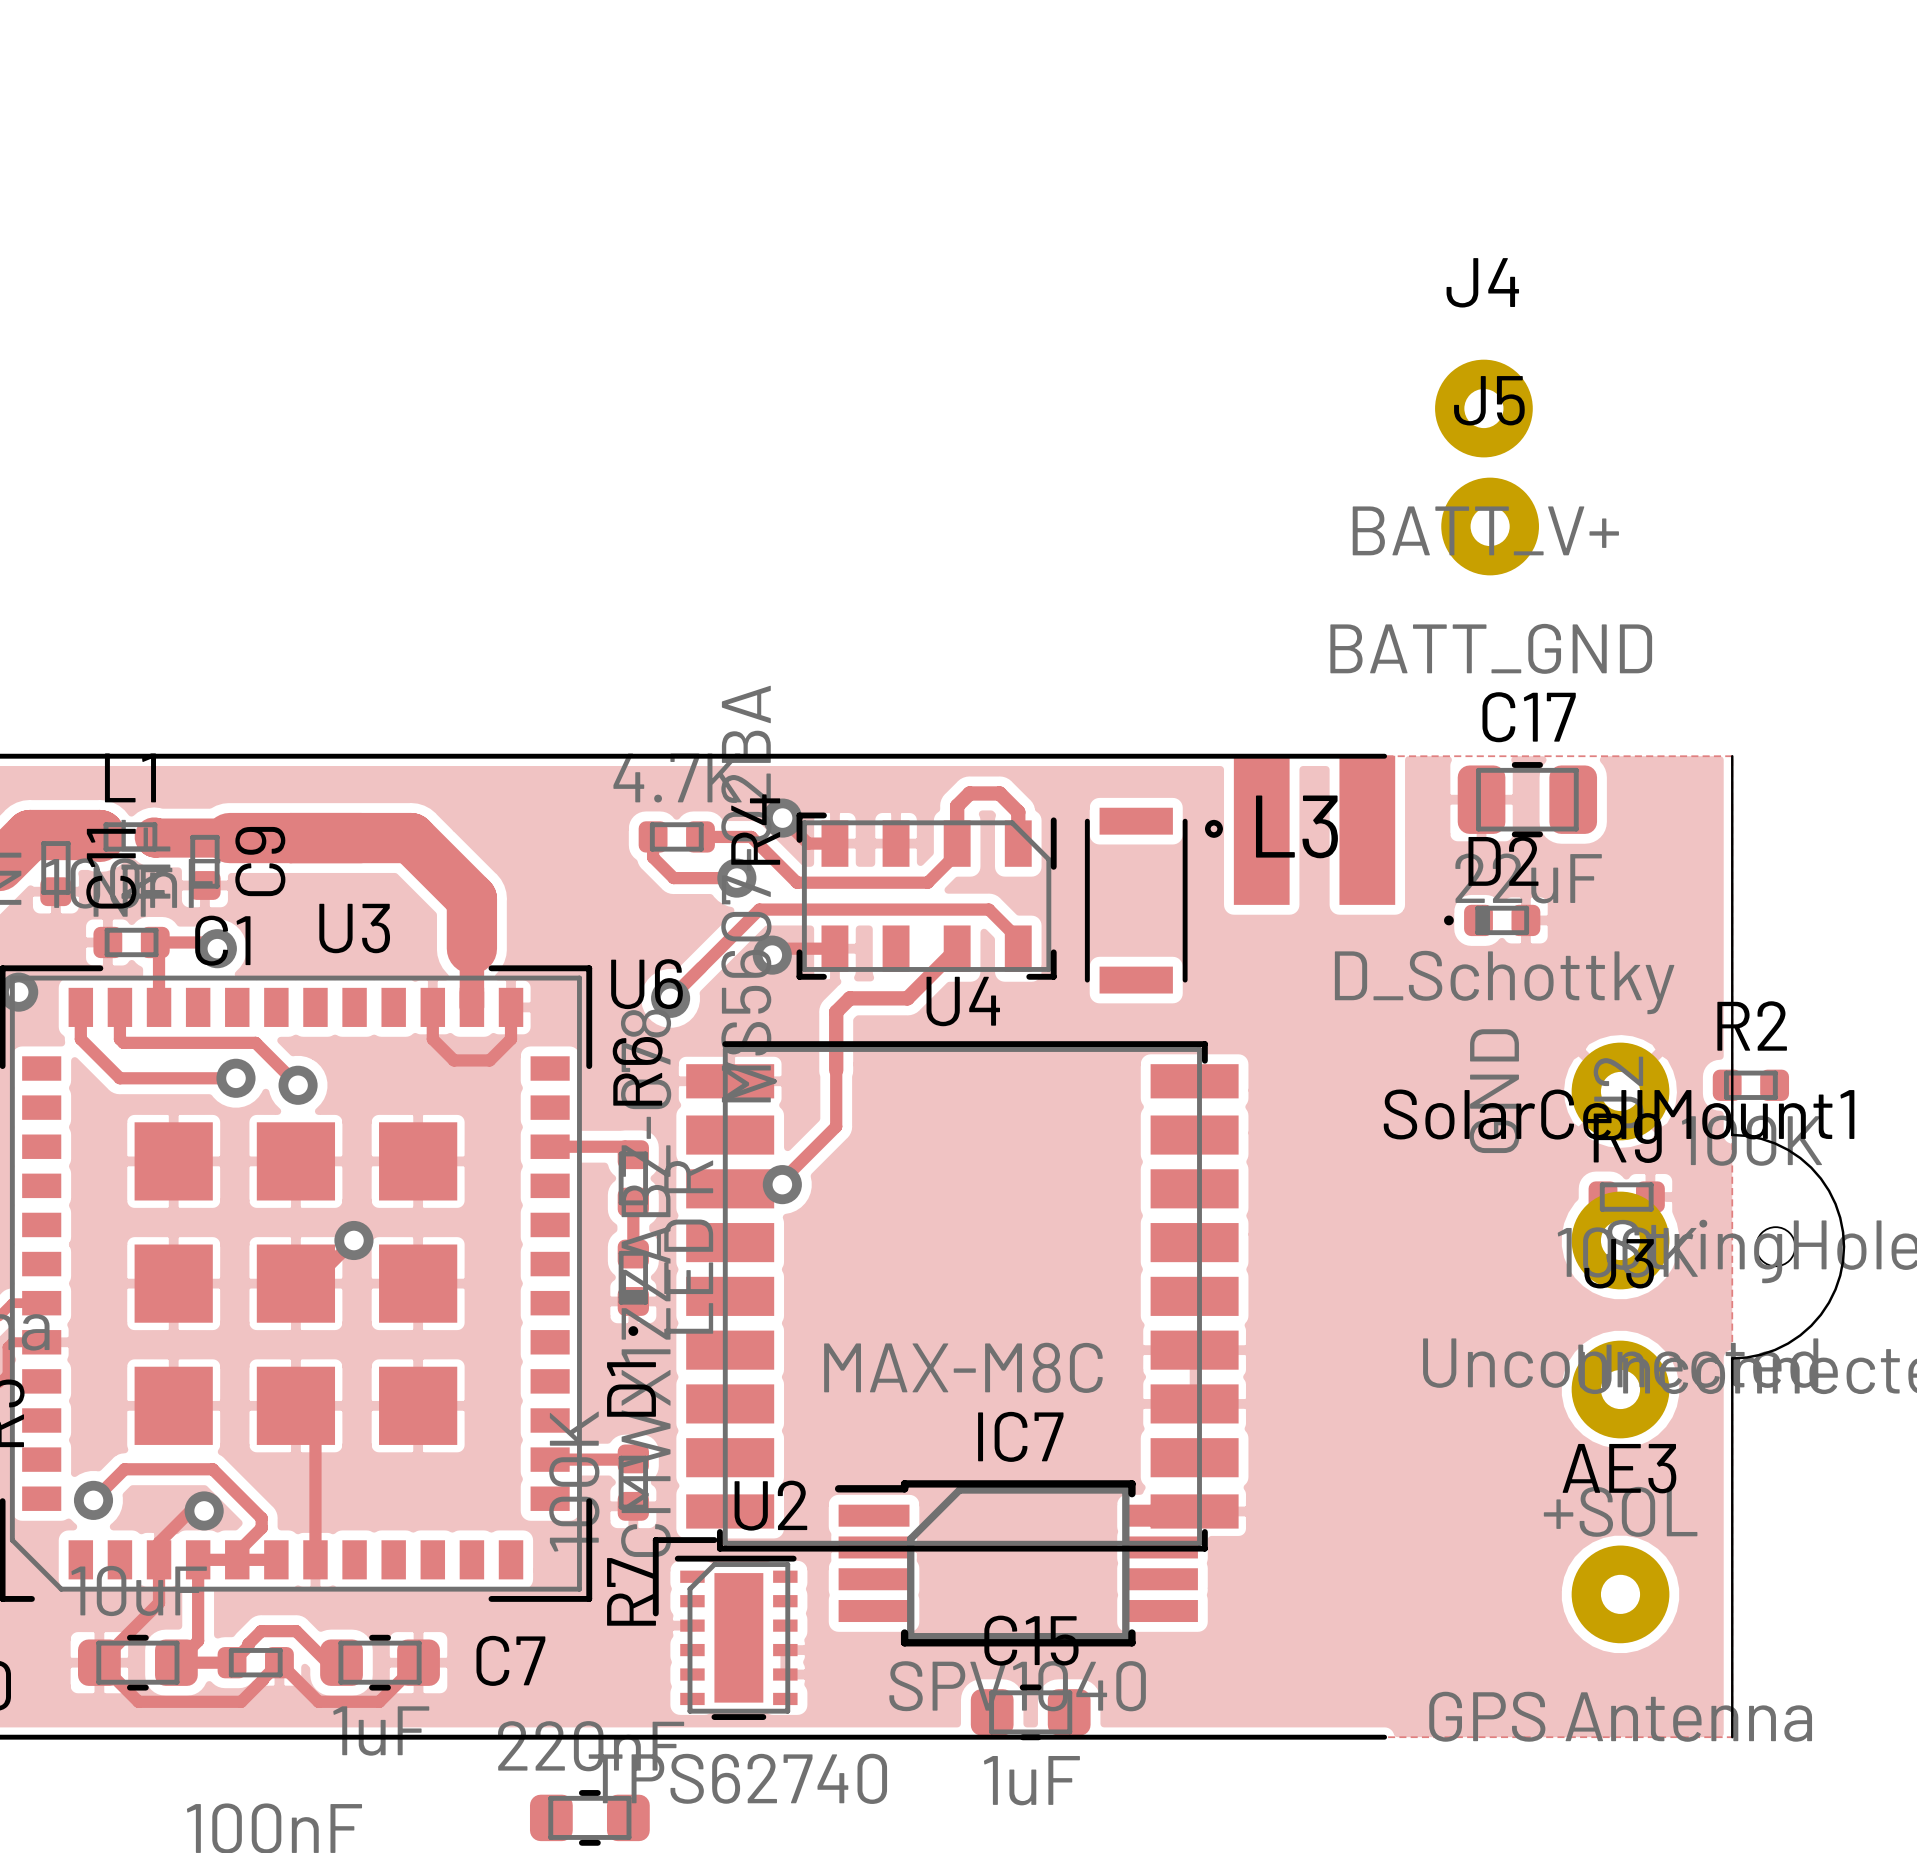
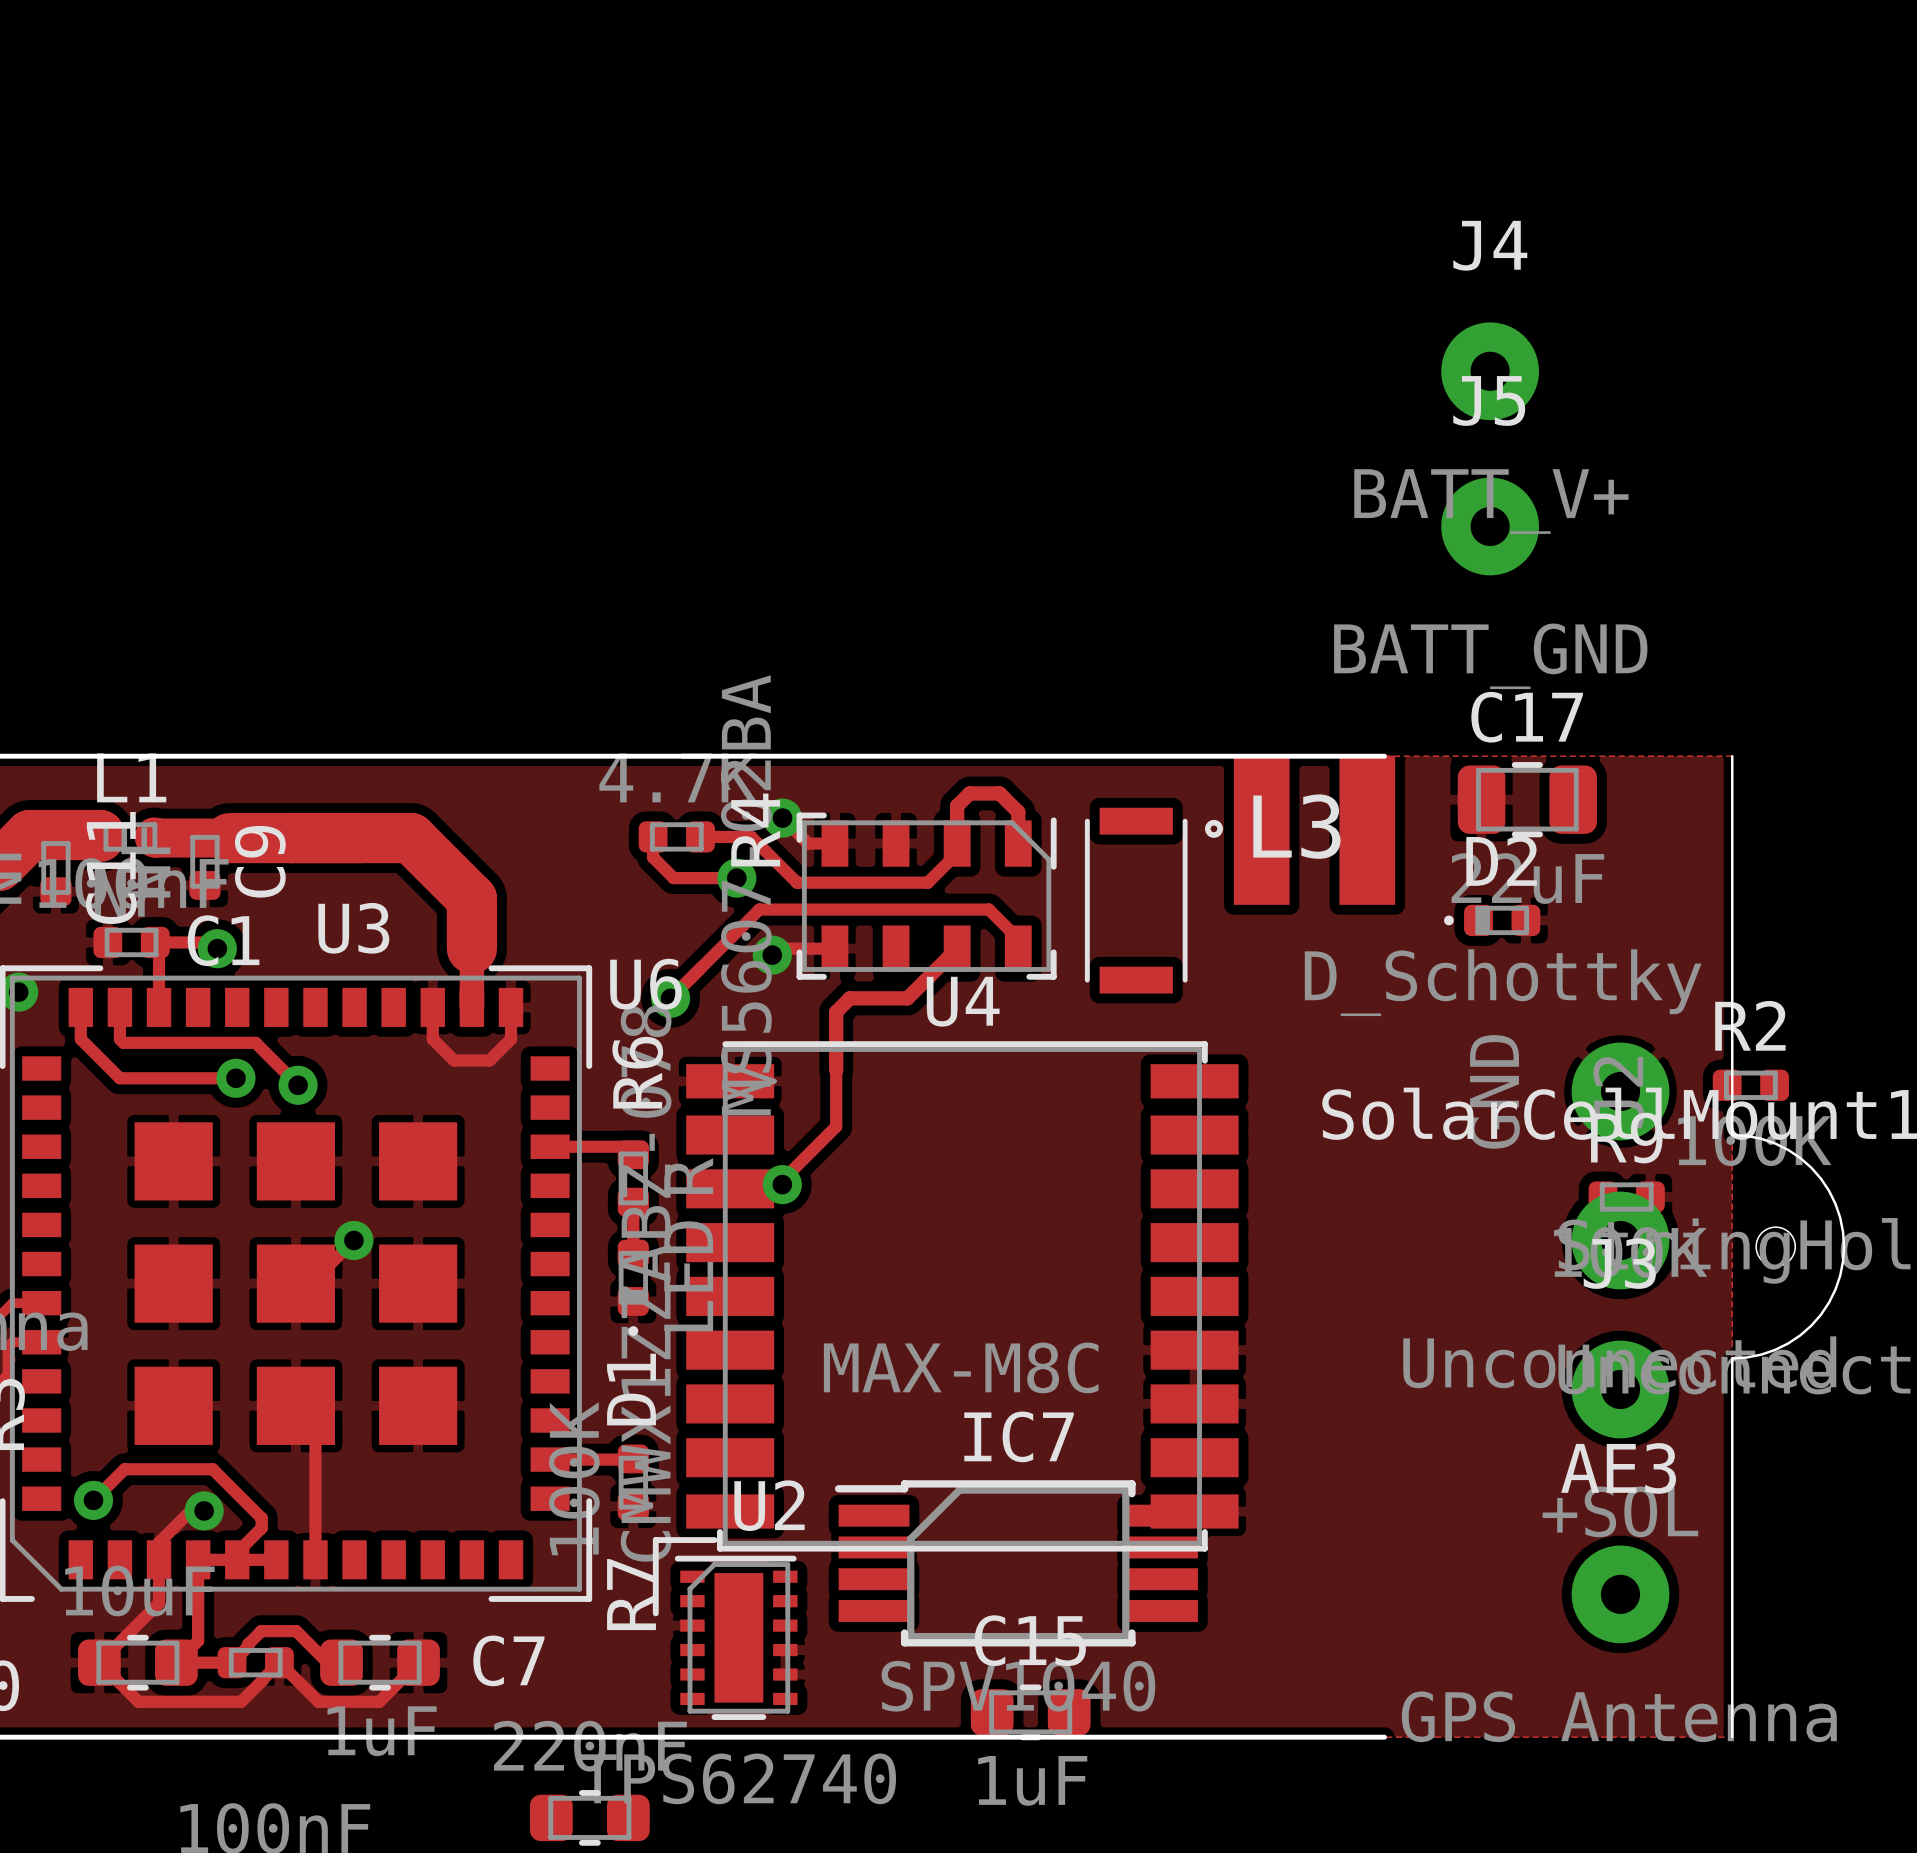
J4 position: (1483, 408) -> (1490, 371)

